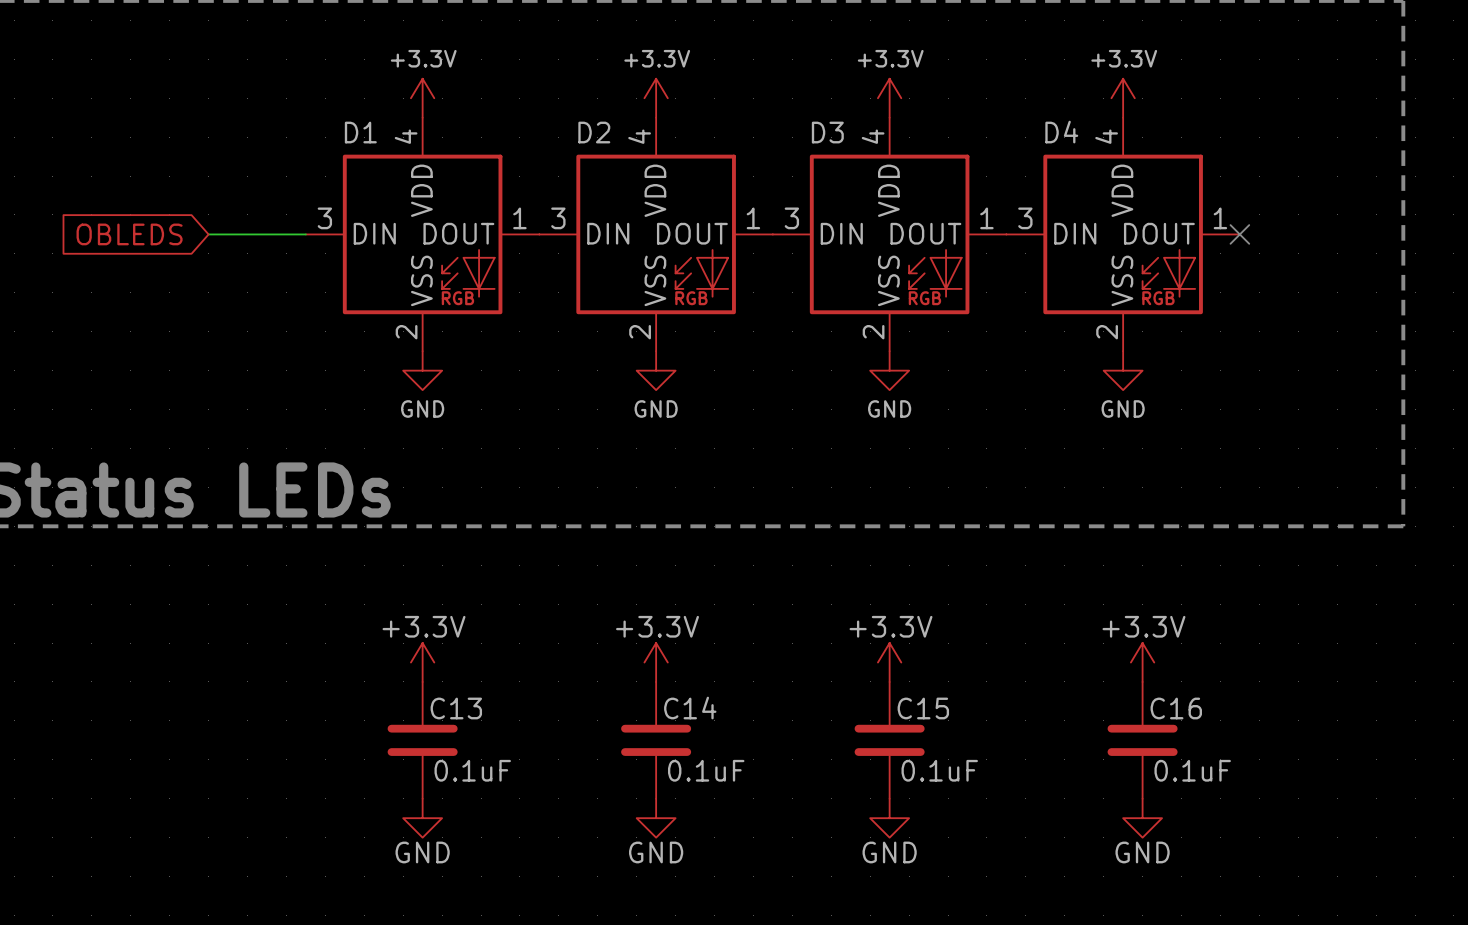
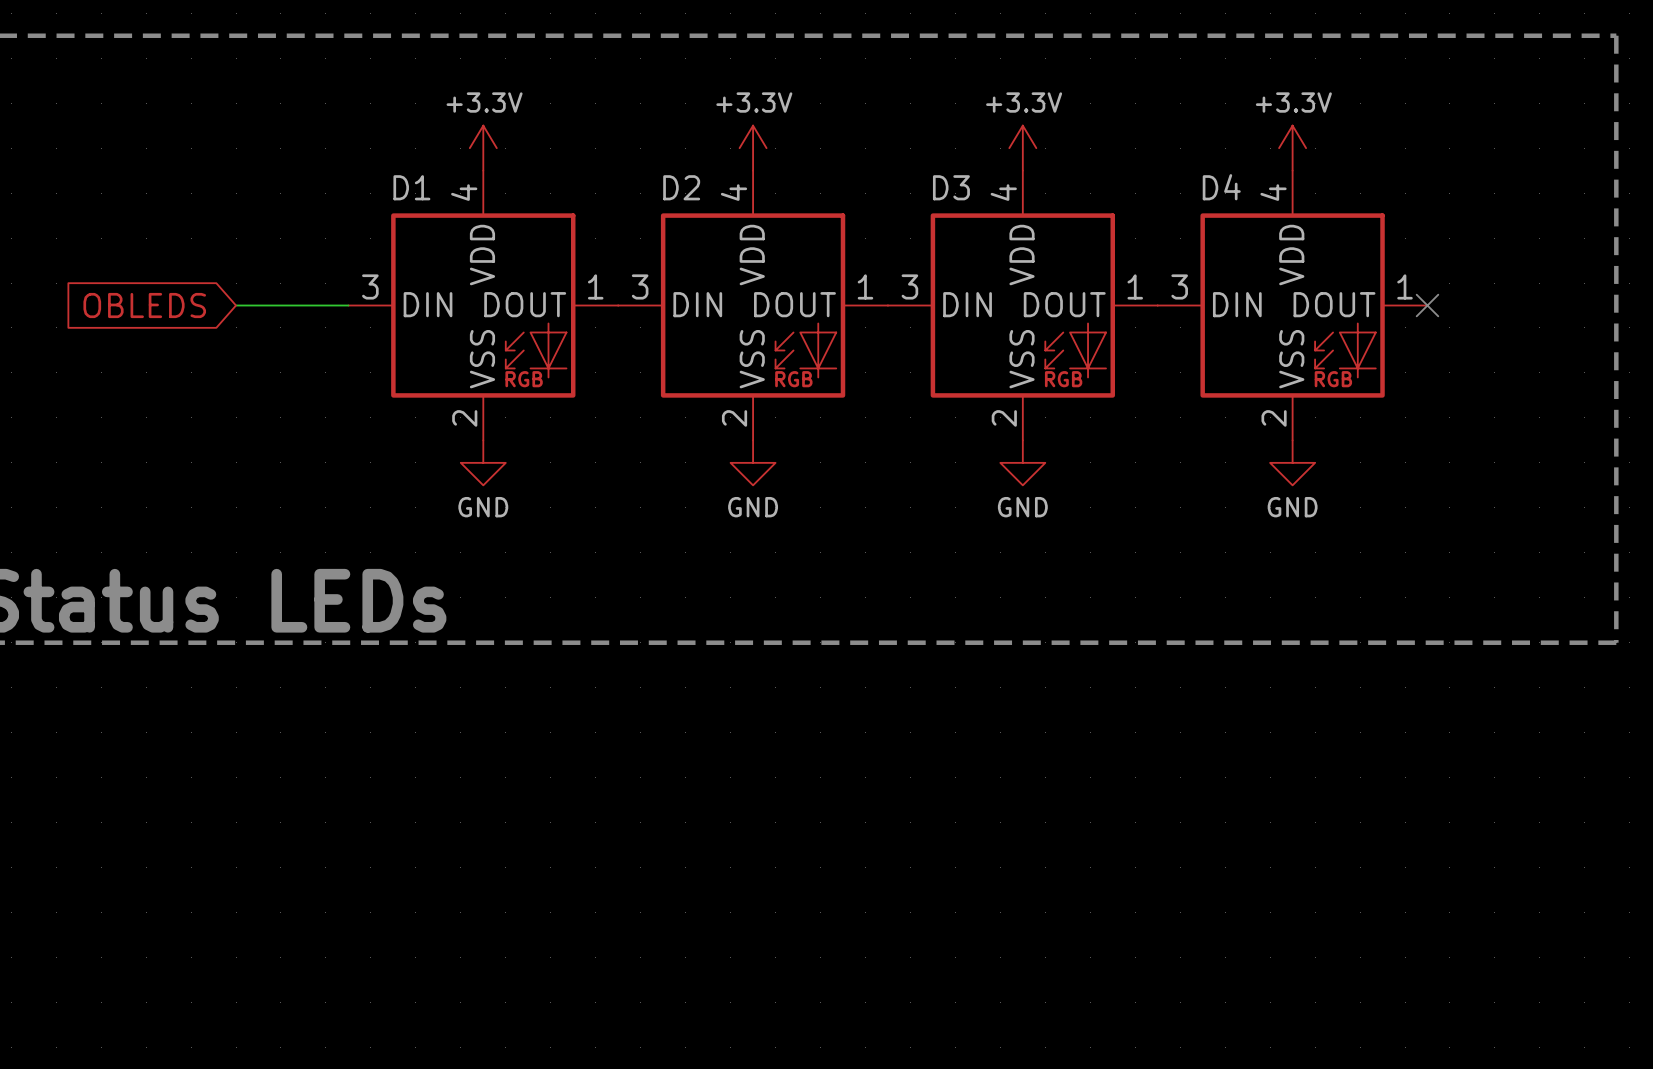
power symbol: +3.3V (422, 662) -> none
power symbol: +3.3V (656, 662) -> none
power symbol: +3.3V (889, 662) -> none
power symbol: +3.3V (1142, 662) -> none
C13: 0.1uF (422, 740) -> none
C14: 0.1uF (656, 740) -> none
C15: 0.1uF (889, 740) -> none
C16: 0.1uF (1142, 740) -> none
power symbol: GND (422, 818) -> none
power symbol: GND (656, 818) -> none
power symbol: GND (889, 818) -> none
power symbol: GND (1142, 818) -> none

